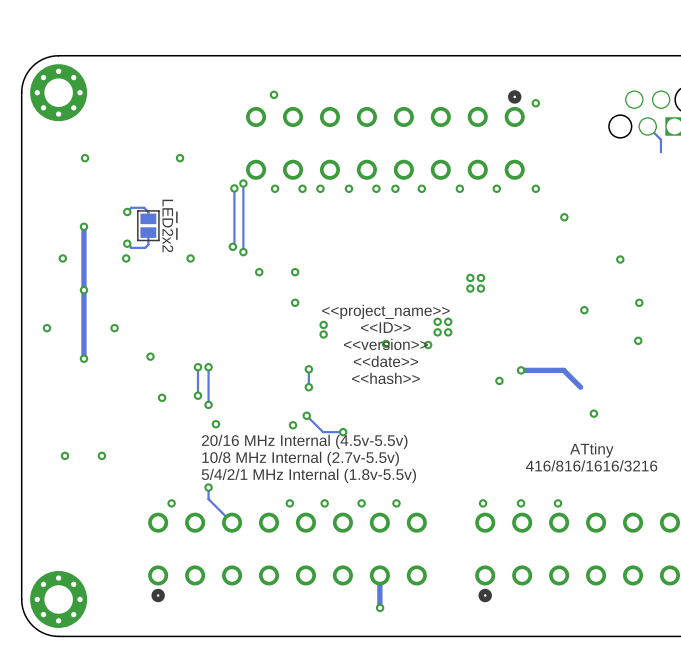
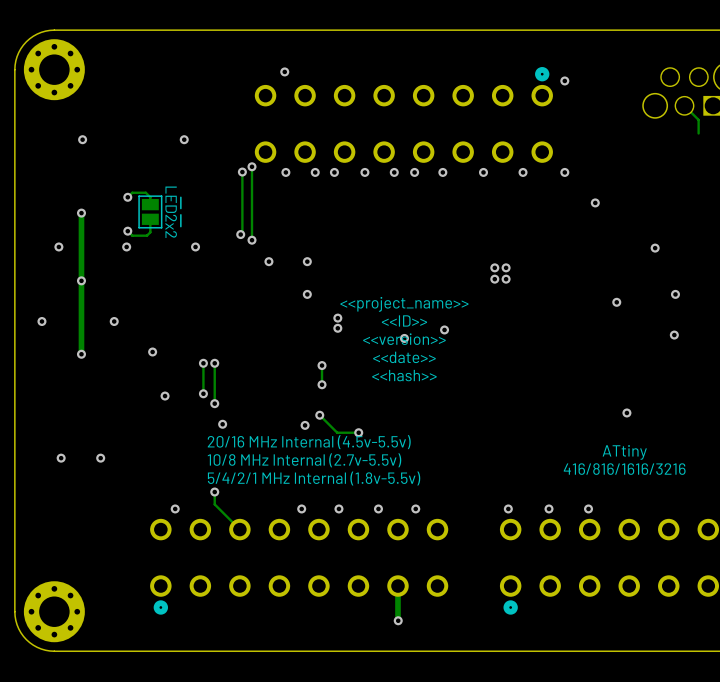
via: (437, 321) -> none
via: (448, 321) -> none
via: (437, 332) -> none
via: (448, 332) -> none
via: none -> (444, 329)
via: (428, 345) -> none
track: (521, 370) (563, 370) (580, 387) -> none
via: (521, 370) -> none
via: (499, 380) -> none

